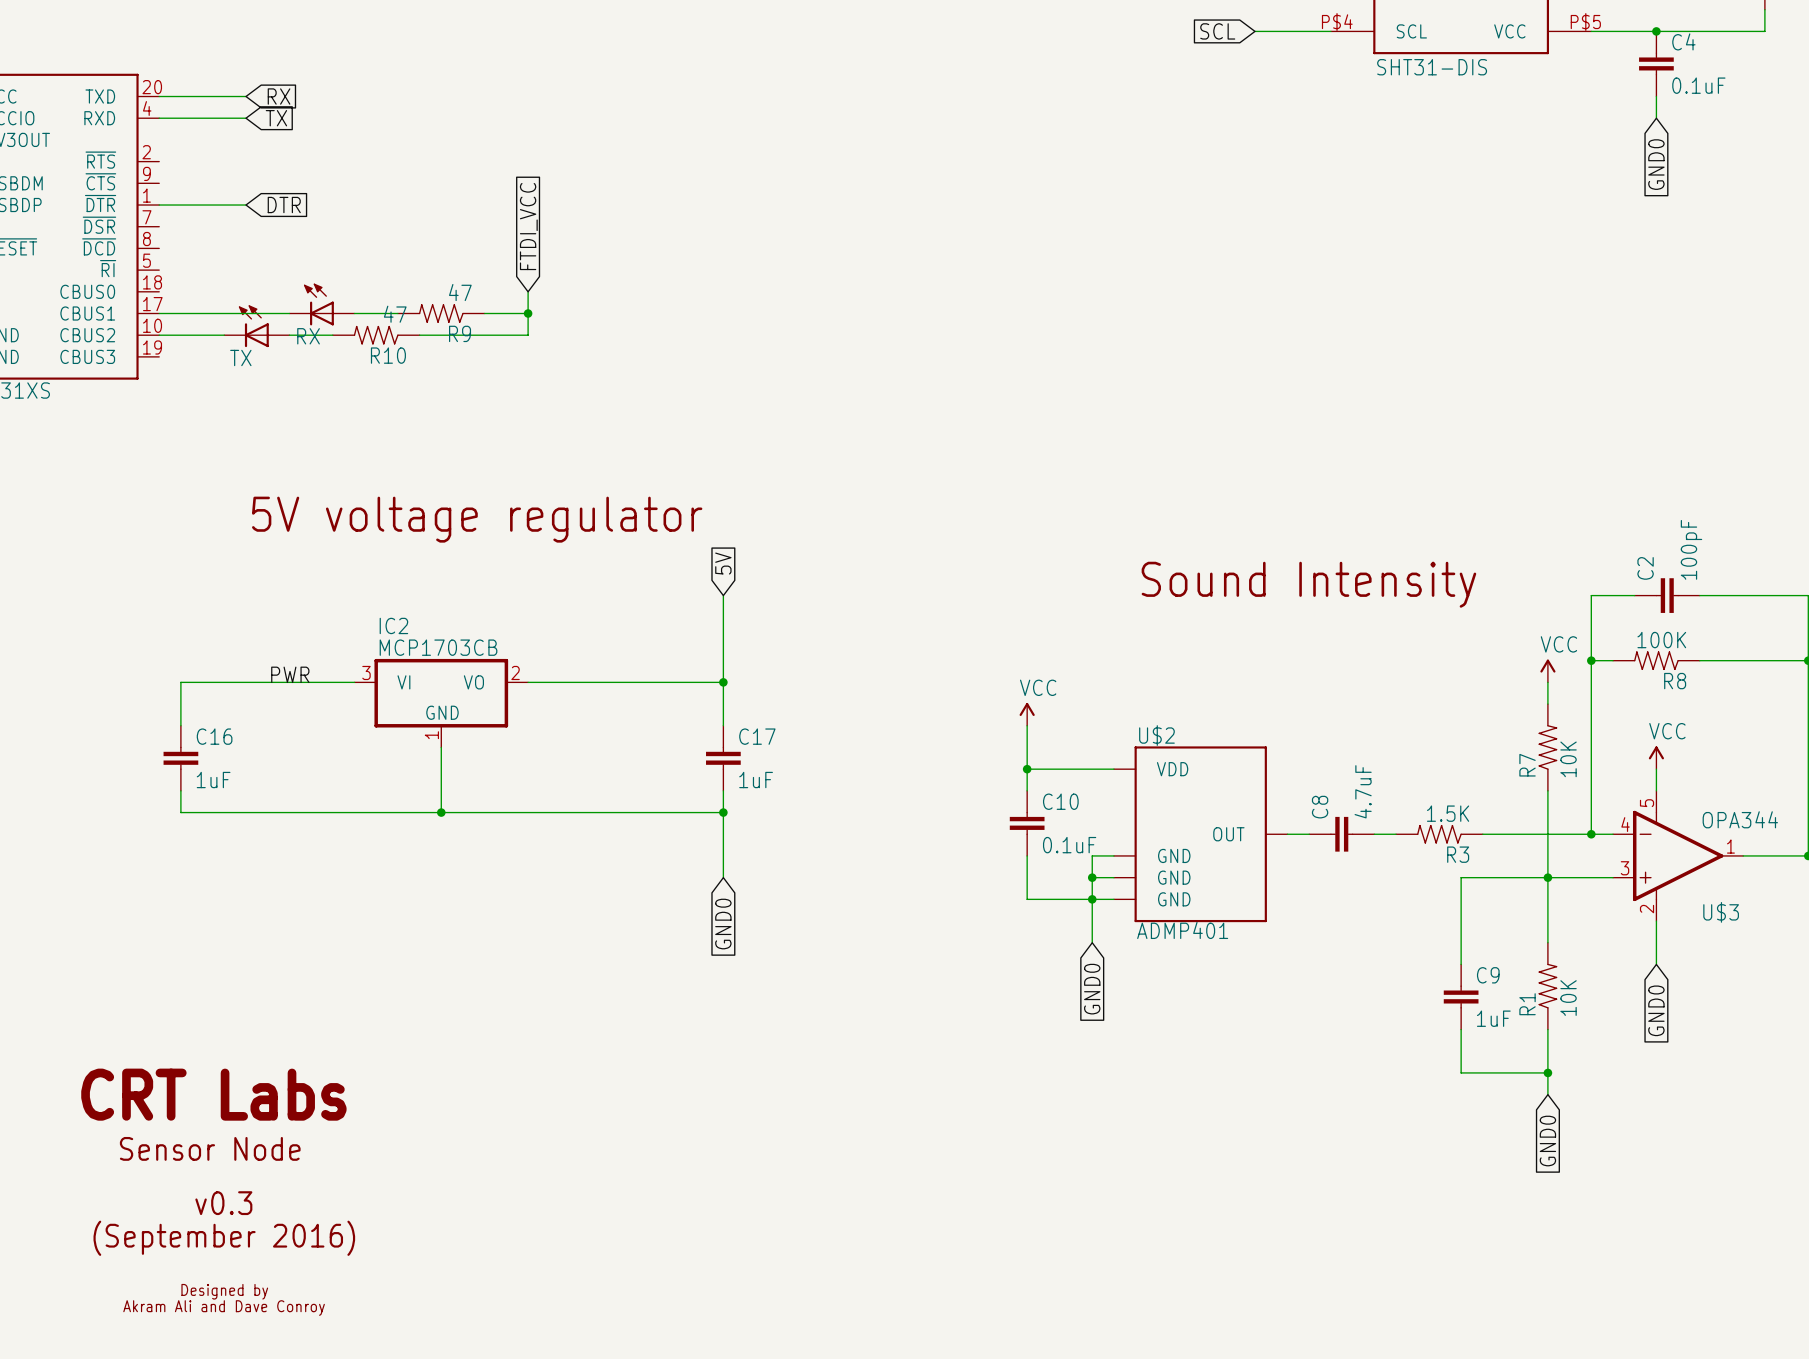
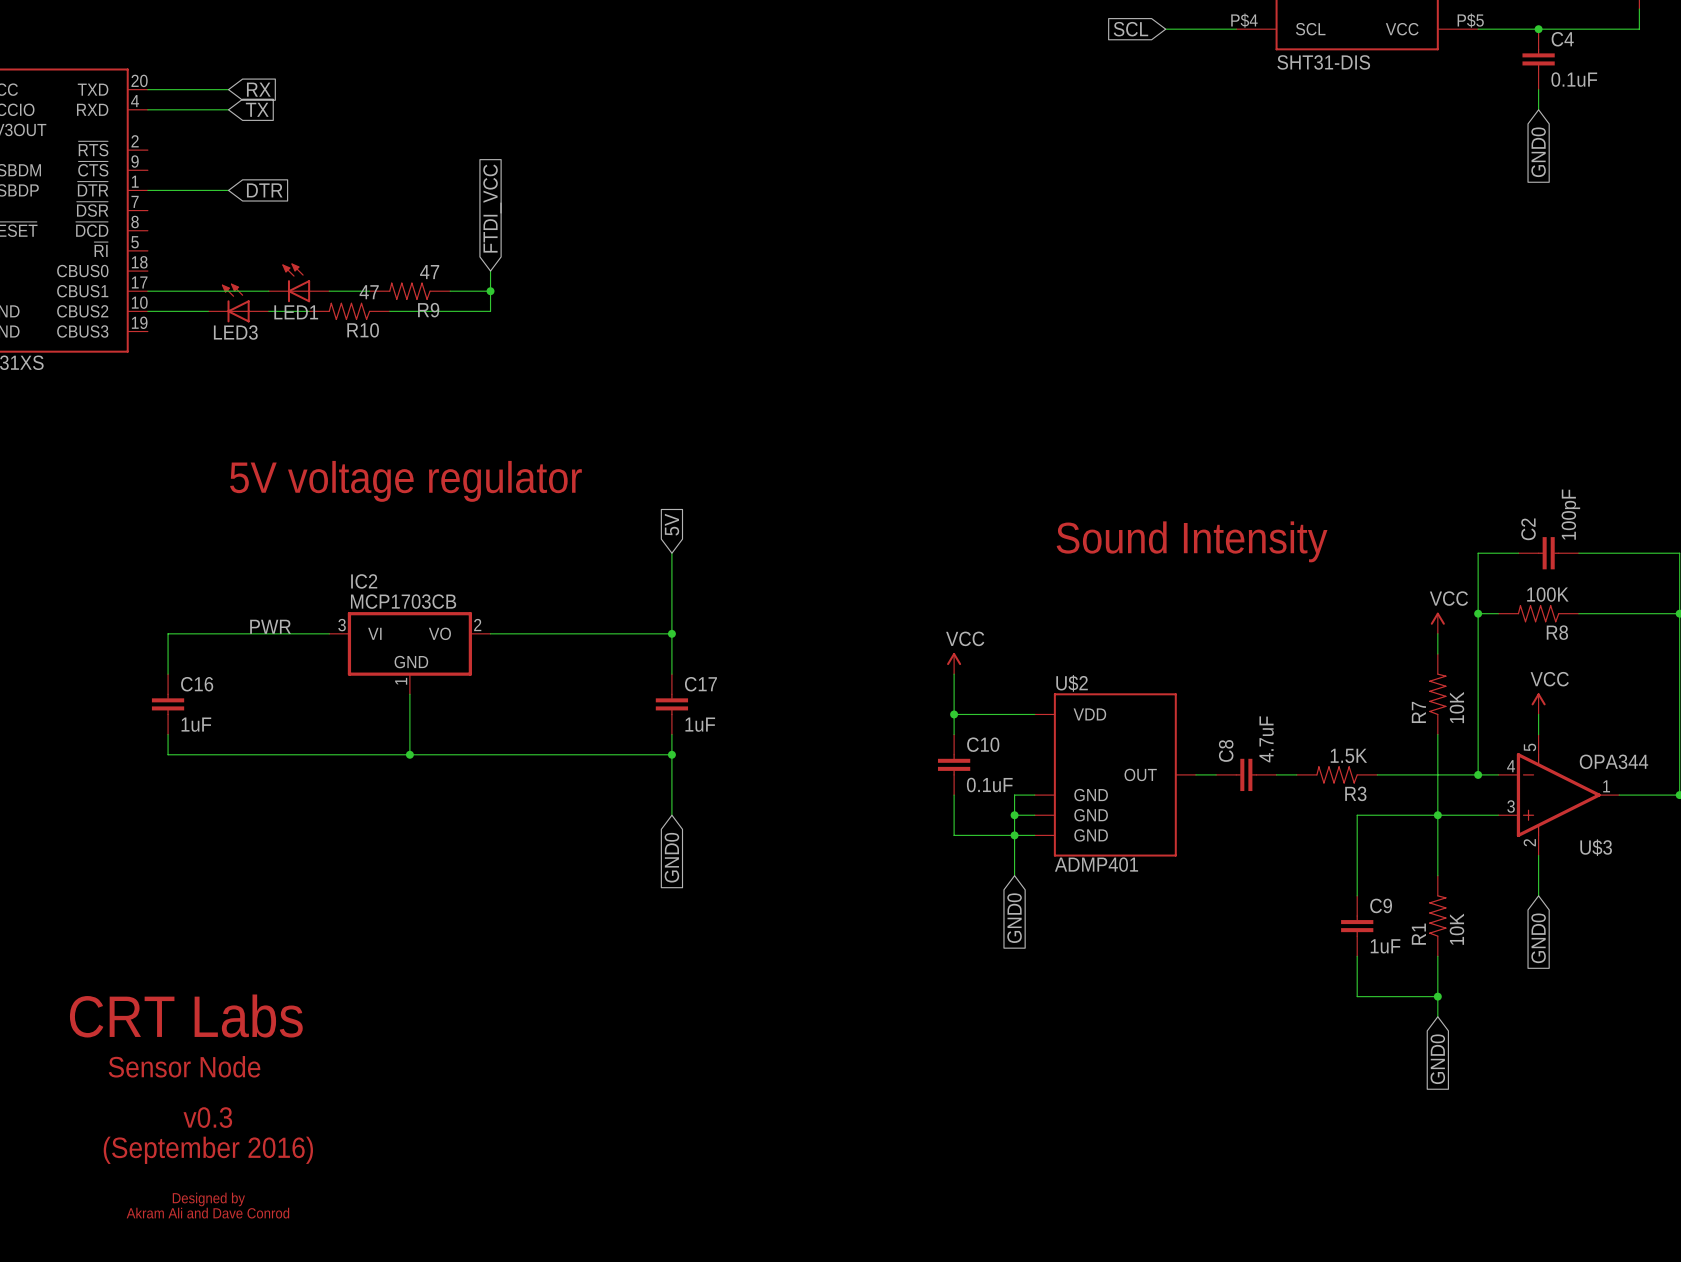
RX name: RX (308, 336) -> LED1 (296, 312)
TX name: TX (240, 357) -> LED3 (235, 332)
text: Akram Ali and Dave Conroy (224, 1308) -> Akram Ali and Dave Conrod (207, 1213)

